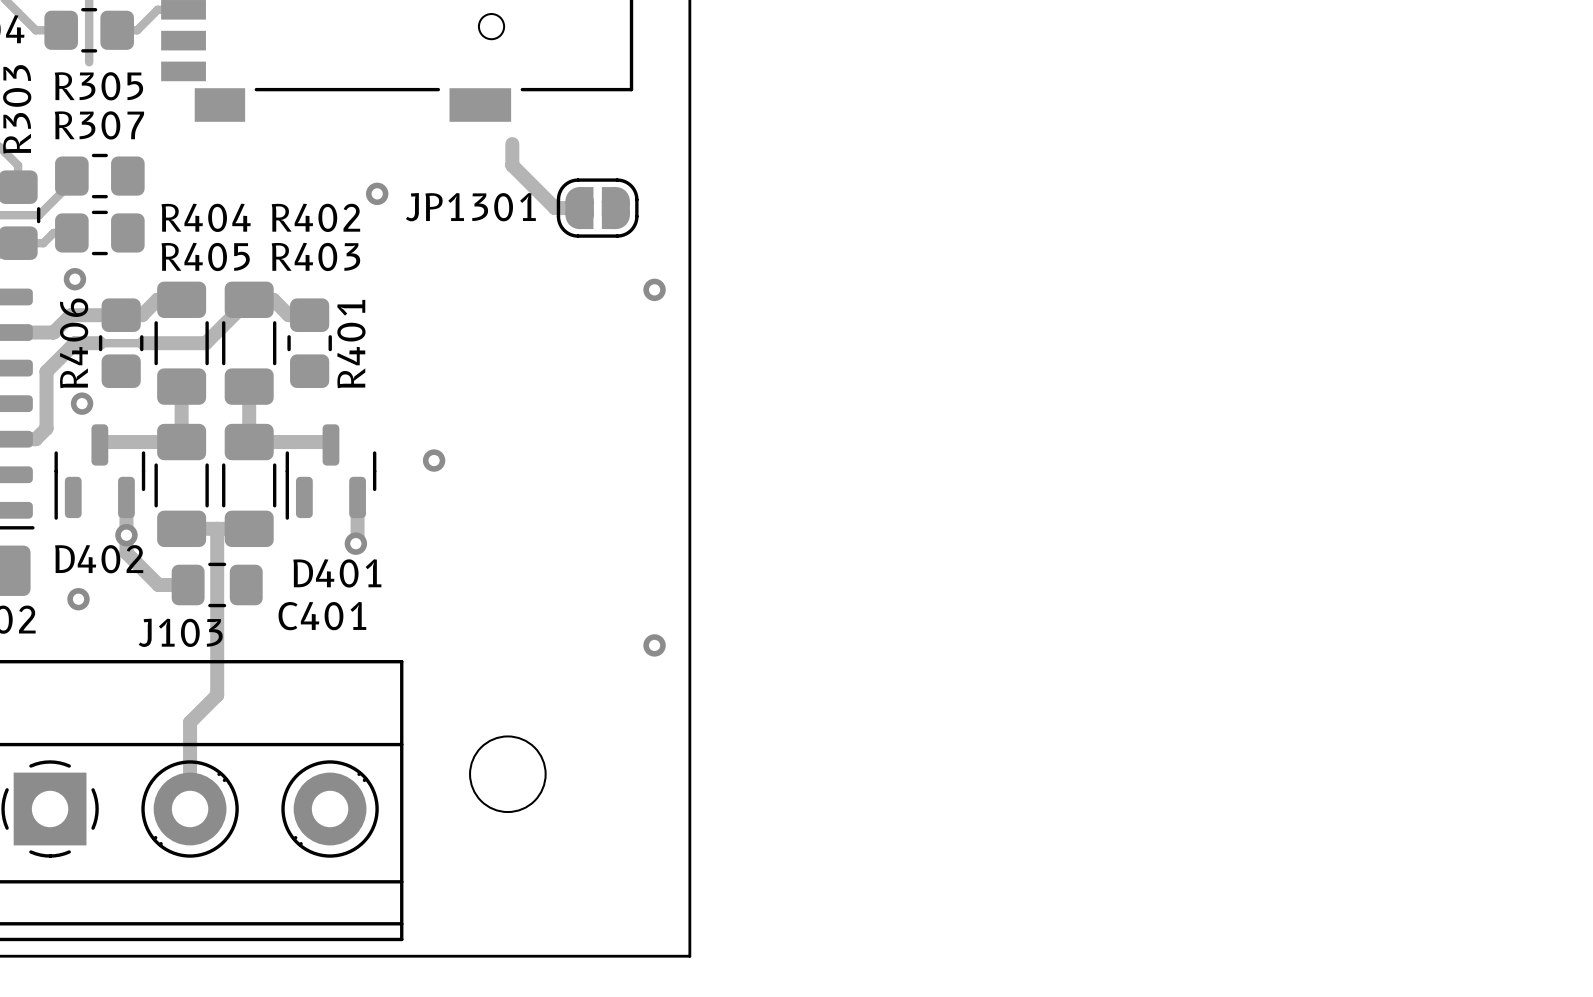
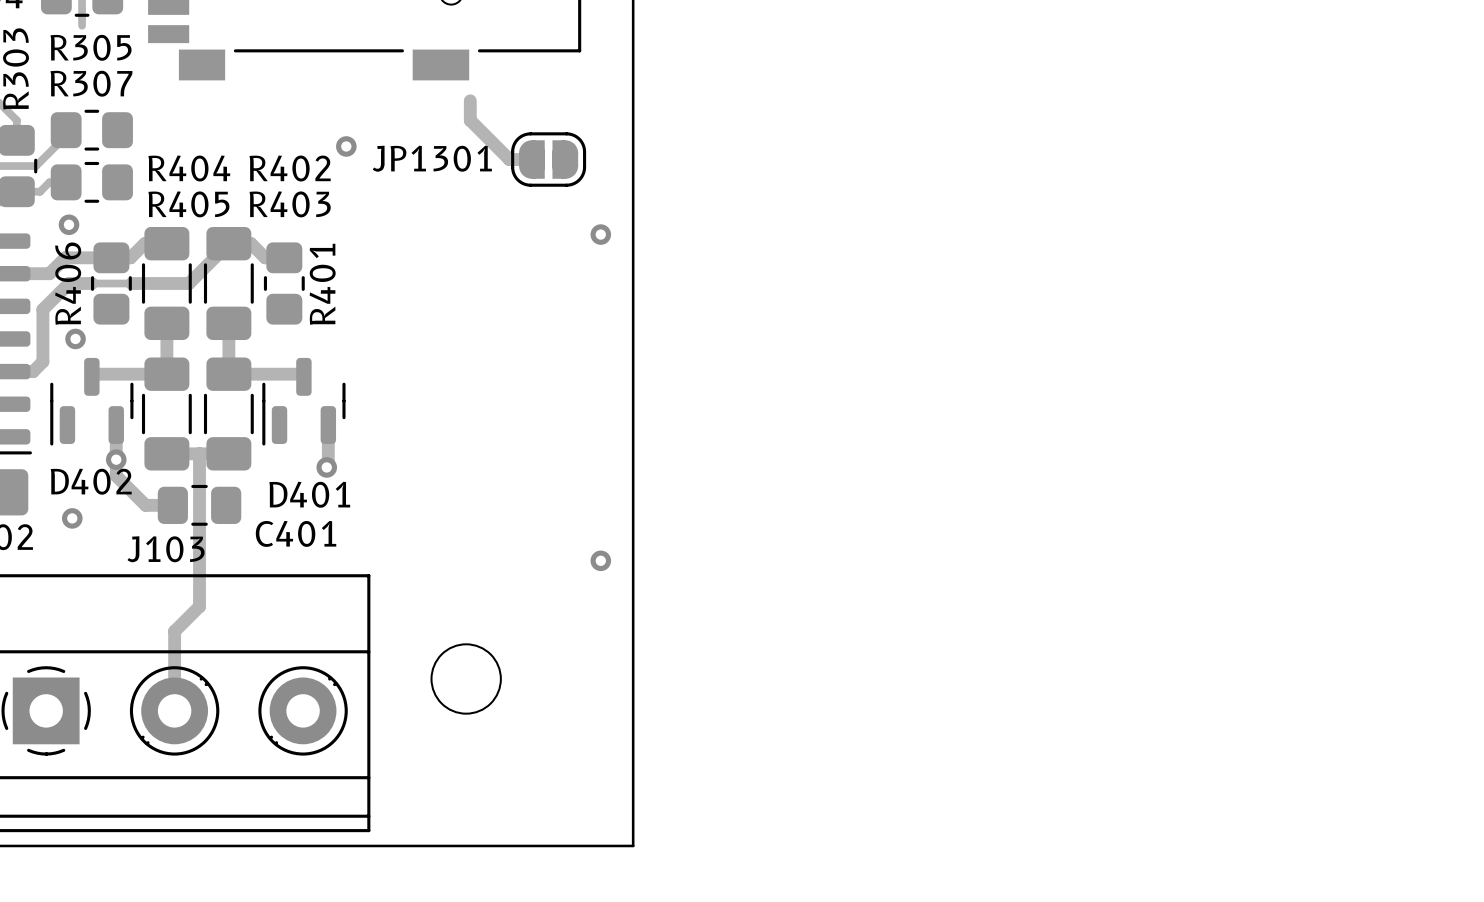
via: (434, 460) -> none

